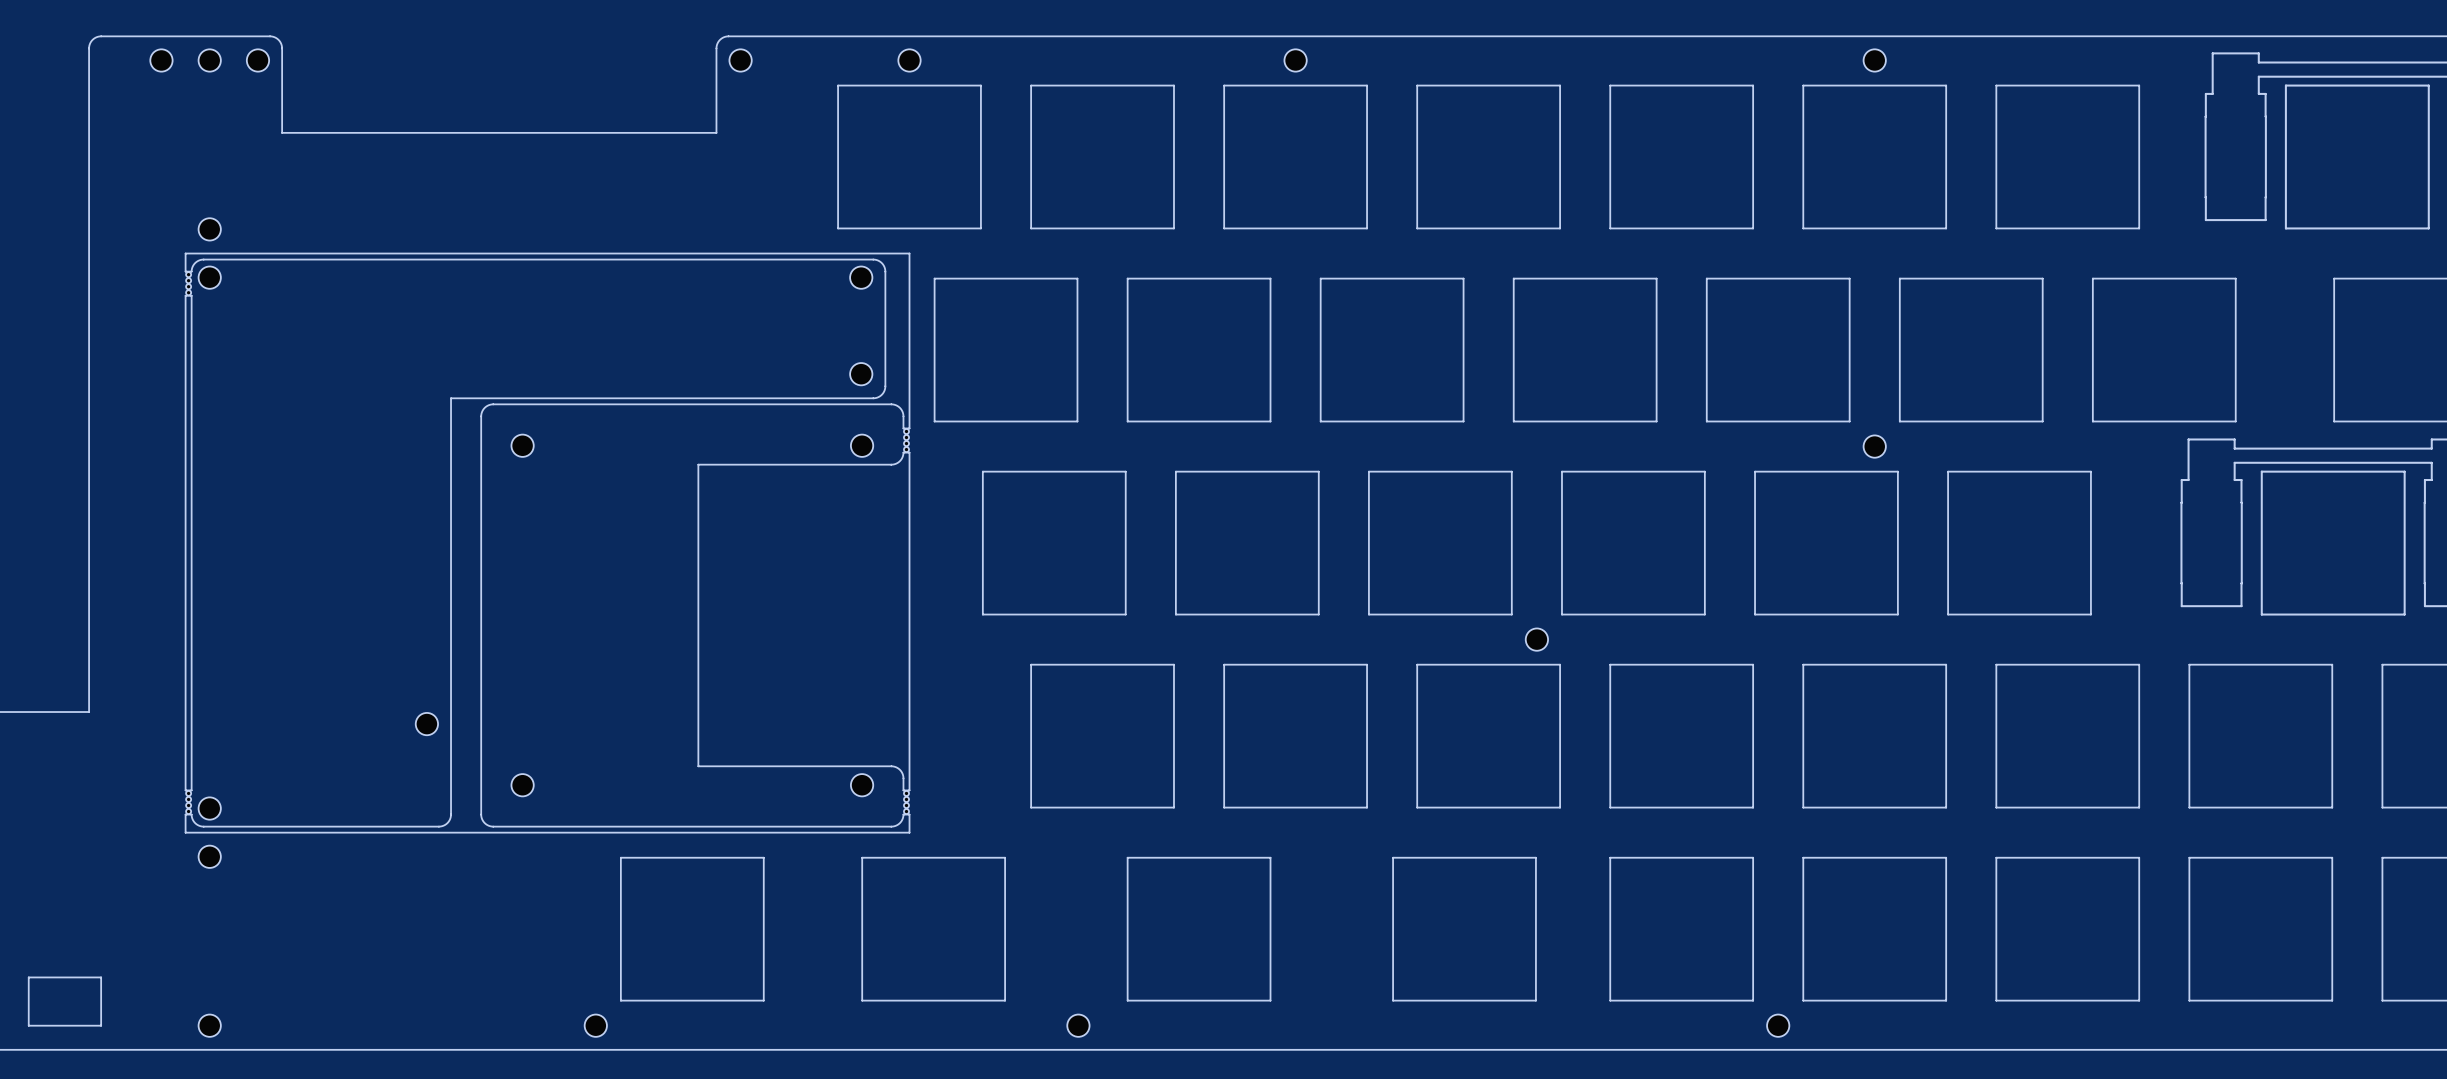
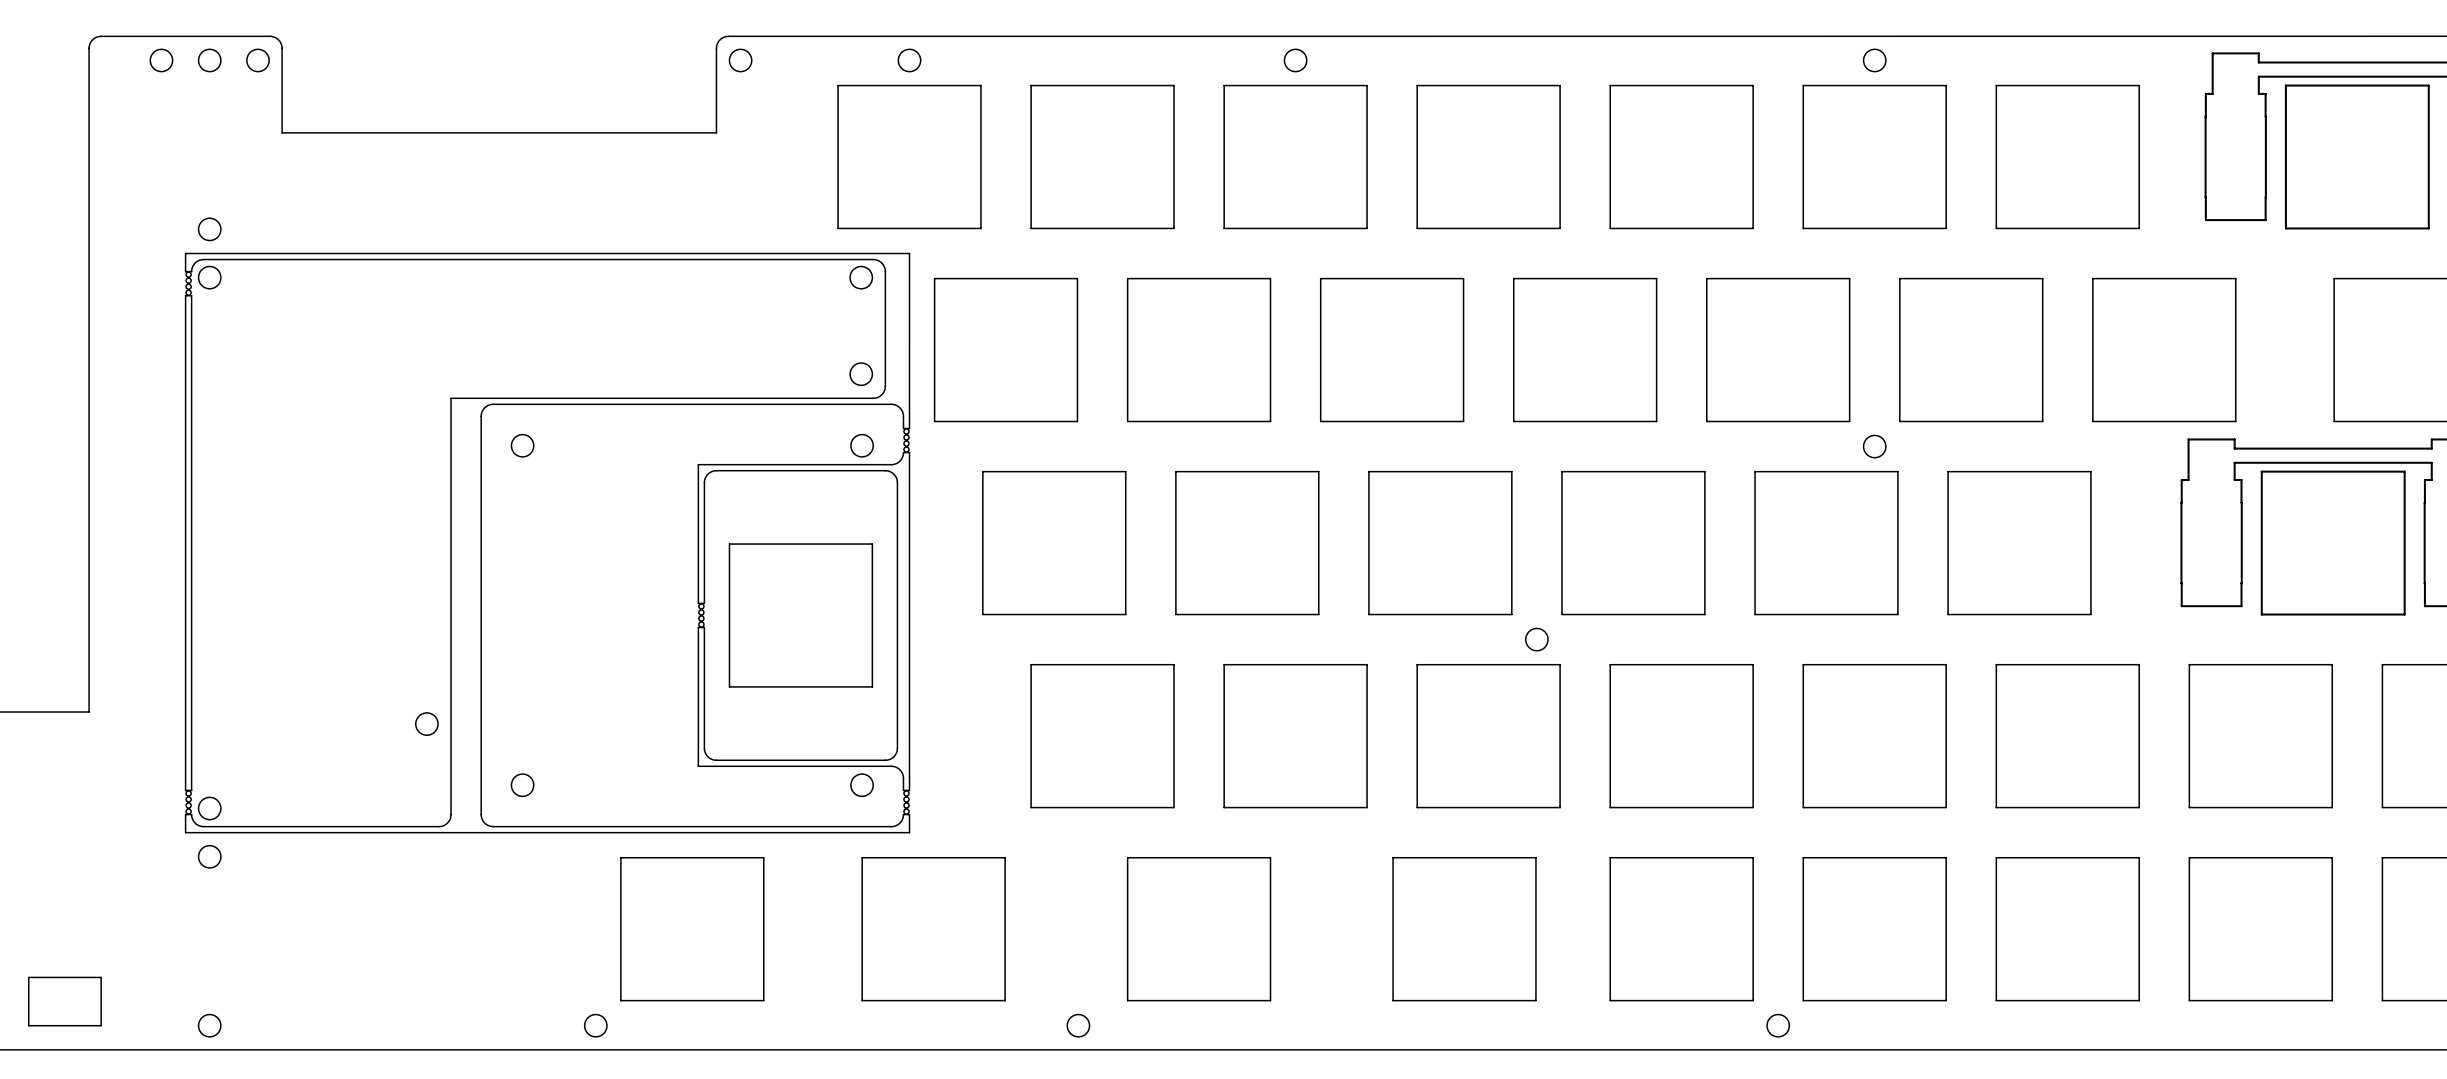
drawing: none -> [728, 543, 874, 688]
board edge: none -> (704, 603) (704, 482) (709, 473) (716, 470) (885, 470) (892, 473) (897, 482) (897, 748) (895, 754) (891, 758) (885, 760) (716, 760) (710, 758) (706, 754) (704, 748) (704, 627)
part: none -> (701, 615)

